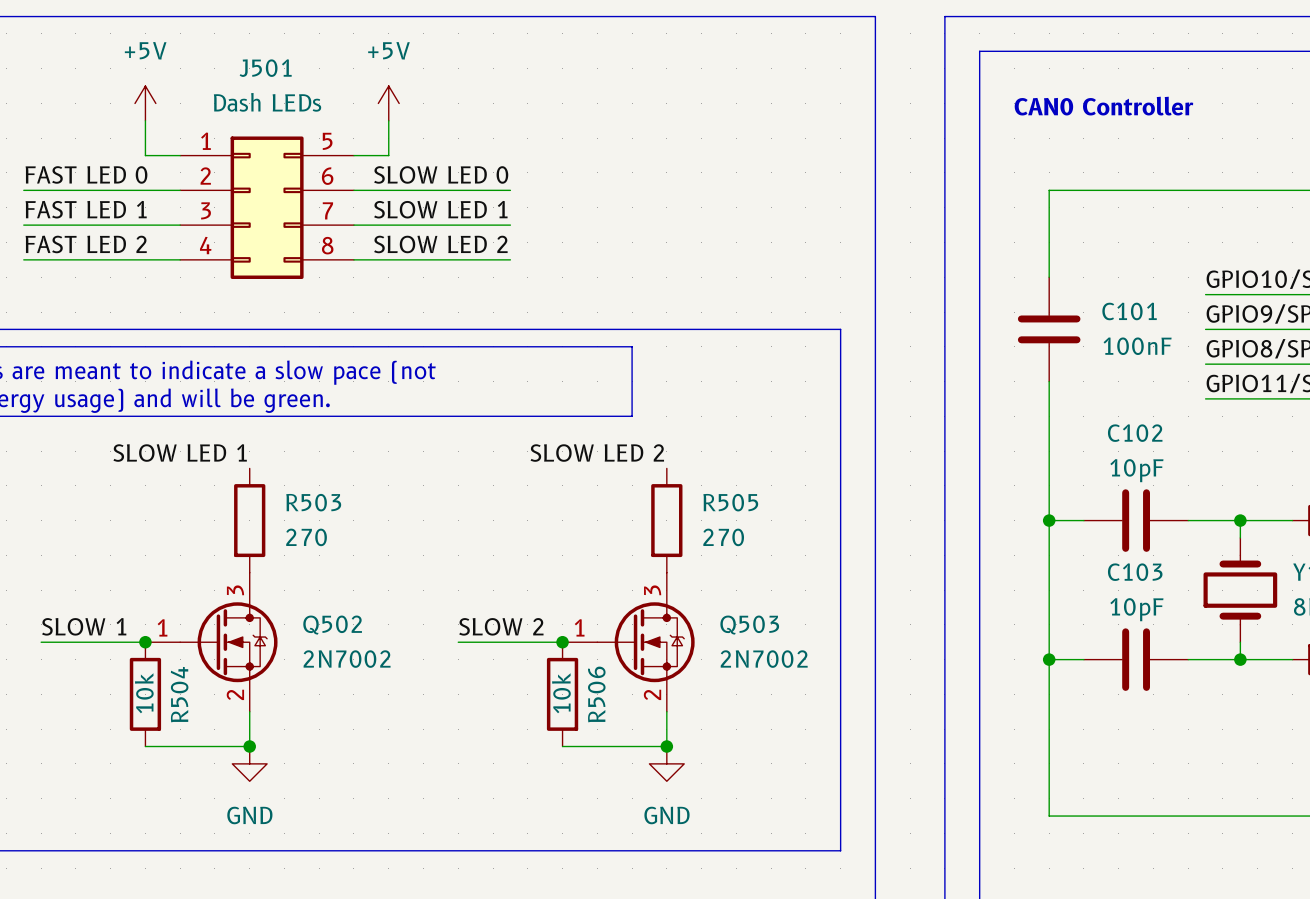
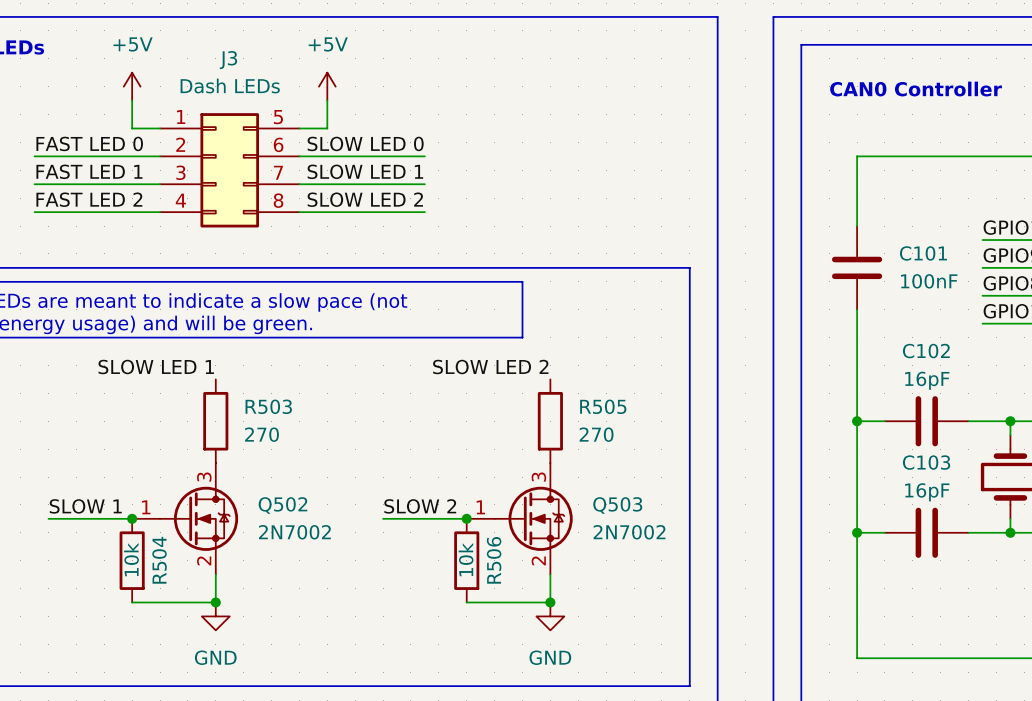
J501 name: J501 (265, 68) -> J3 (228, 60)
C102 value: 10pF (1136, 470) -> 16pF (927, 380)
C103 value: 10pF (1136, 609) -> 16pF (927, 492)

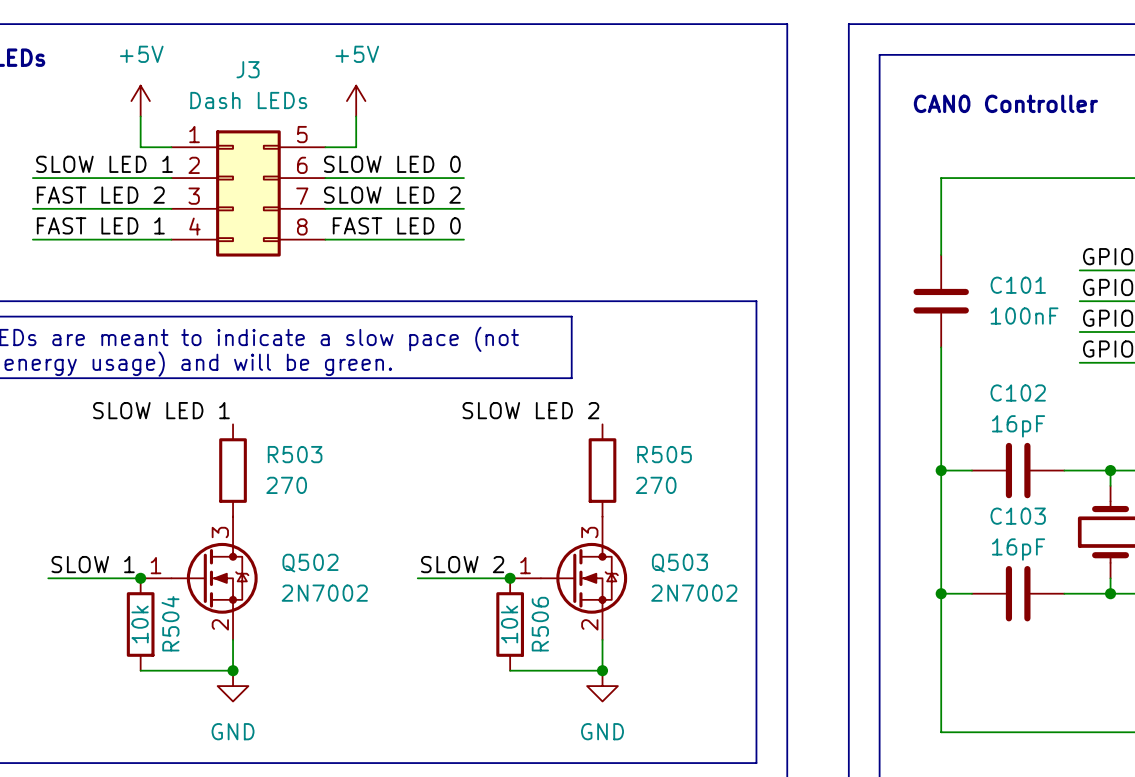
label: FAST LED 0 (89, 143) -> SLOW LED 1 (104, 164)
label: FAST LED 1 (89, 171) -> FAST LED 2 (100, 195)
label: SLOW LED 1 (365, 171) -> SLOW LED 2 (392, 195)
label: FAST LED 2 (89, 199) -> FAST LED 1 (100, 225)
label: SLOW LED 2 (365, 199) -> FAST LED 0 (396, 225)

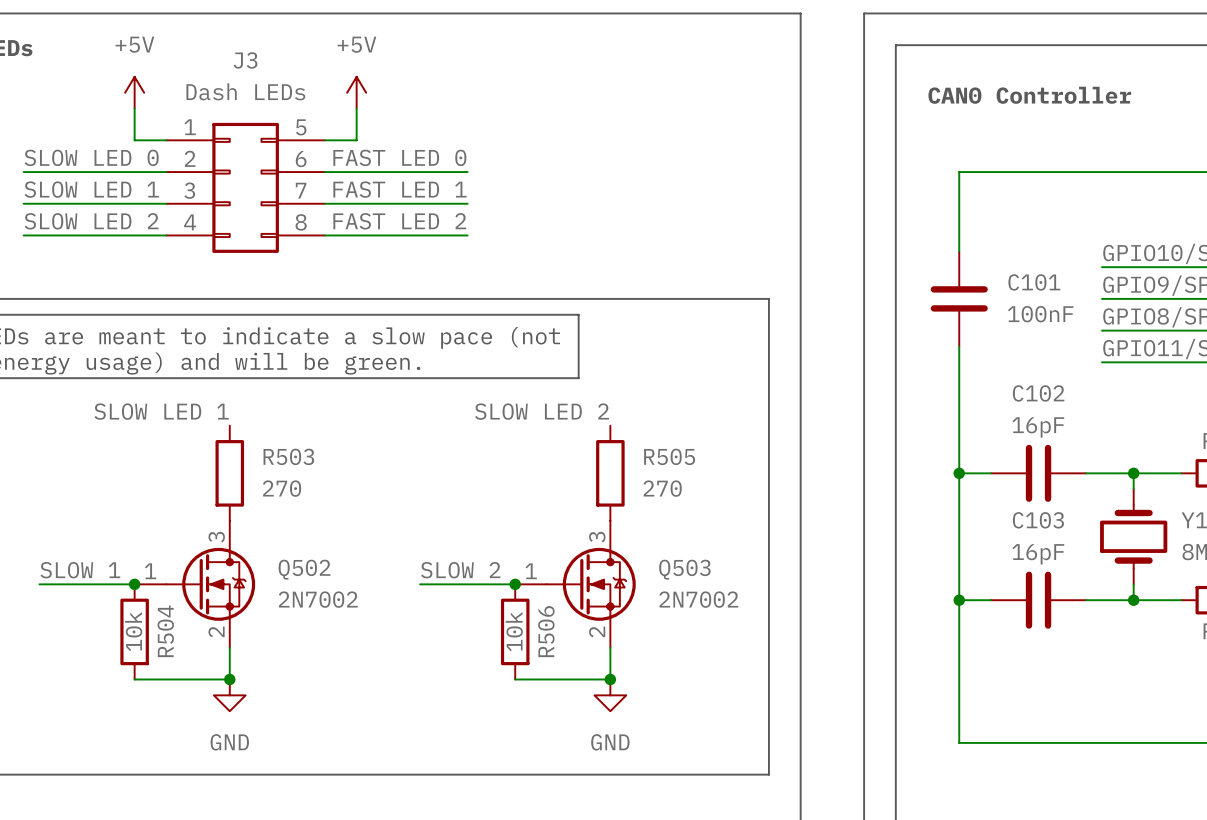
label: SLOW LED 1 (104, 164) -> SLOW LED 0 (91, 157)
label: SLOW LED 0 (392, 164) -> FAST LED 0 (399, 157)
label: FAST LED 2 (100, 195) -> SLOW LED 1 (91, 189)
label: SLOW LED 2 (392, 195) -> FAST LED 1 (399, 189)
label: FAST LED 1 (100, 225) -> SLOW LED 2 (91, 221)
label: FAST LED 0 (396, 225) -> FAST LED 2 (399, 221)

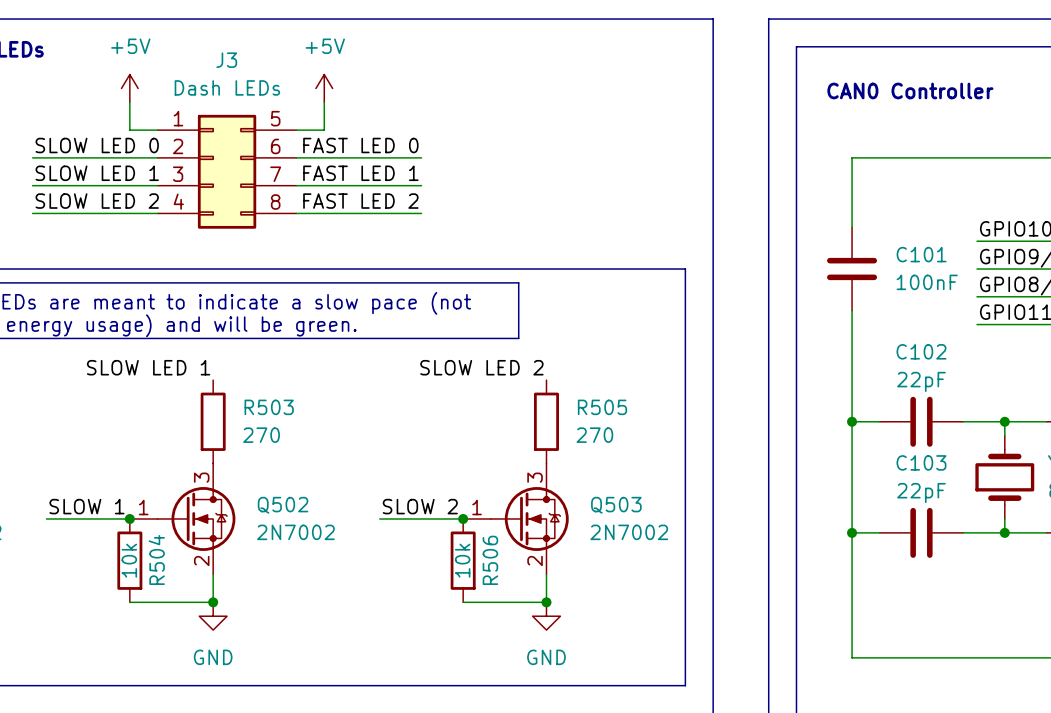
C102 value: 16pF (1038, 427) -> 22pF (921, 381)
C103 value: 16pF (1038, 554) -> 22pF (921, 493)

